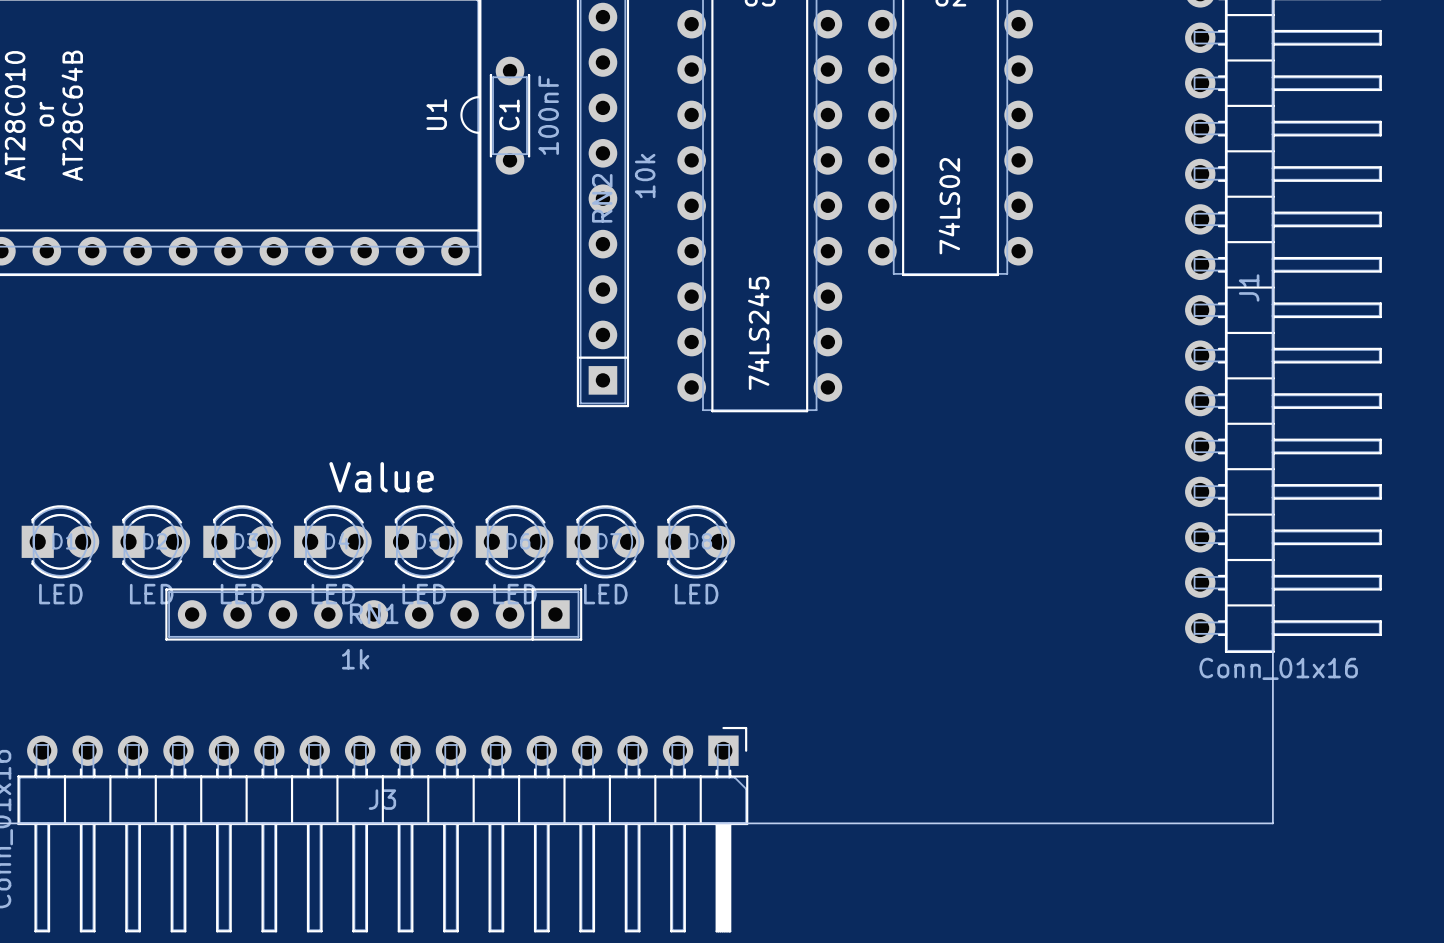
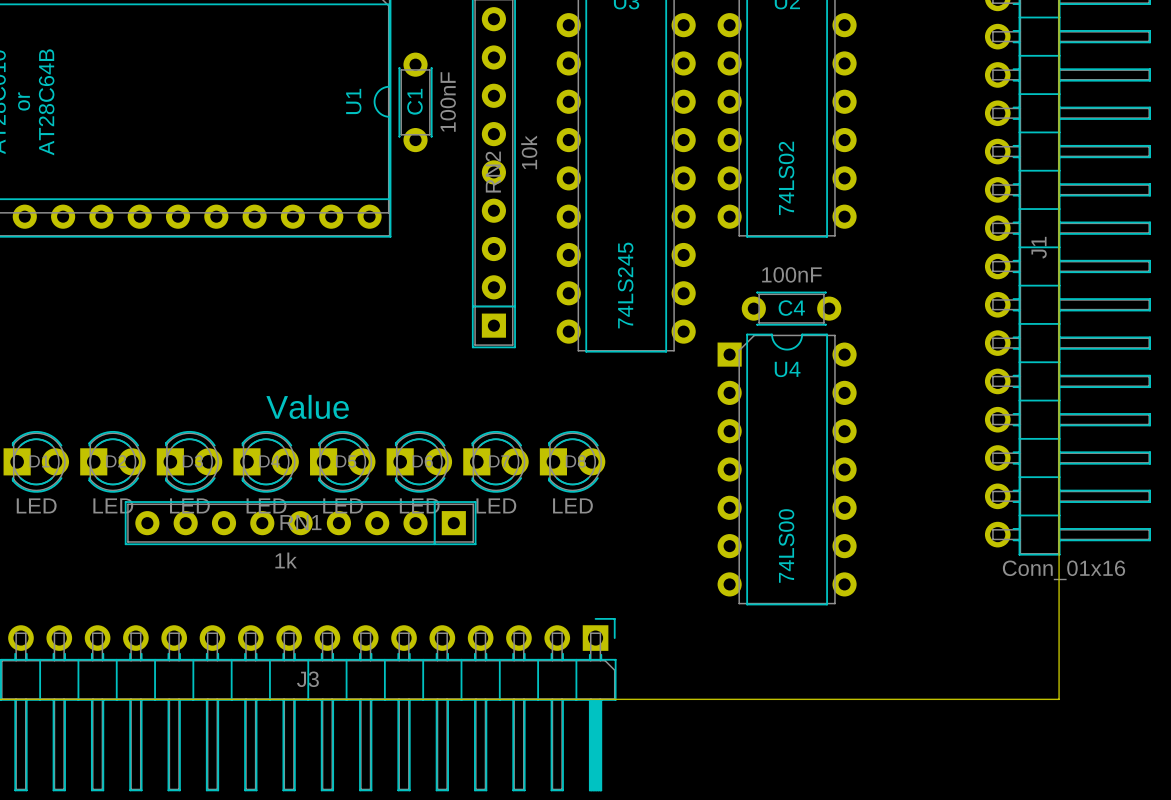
C4: none -> 100nF (791, 308)
U4: none -> 74LS00 (787, 469)

